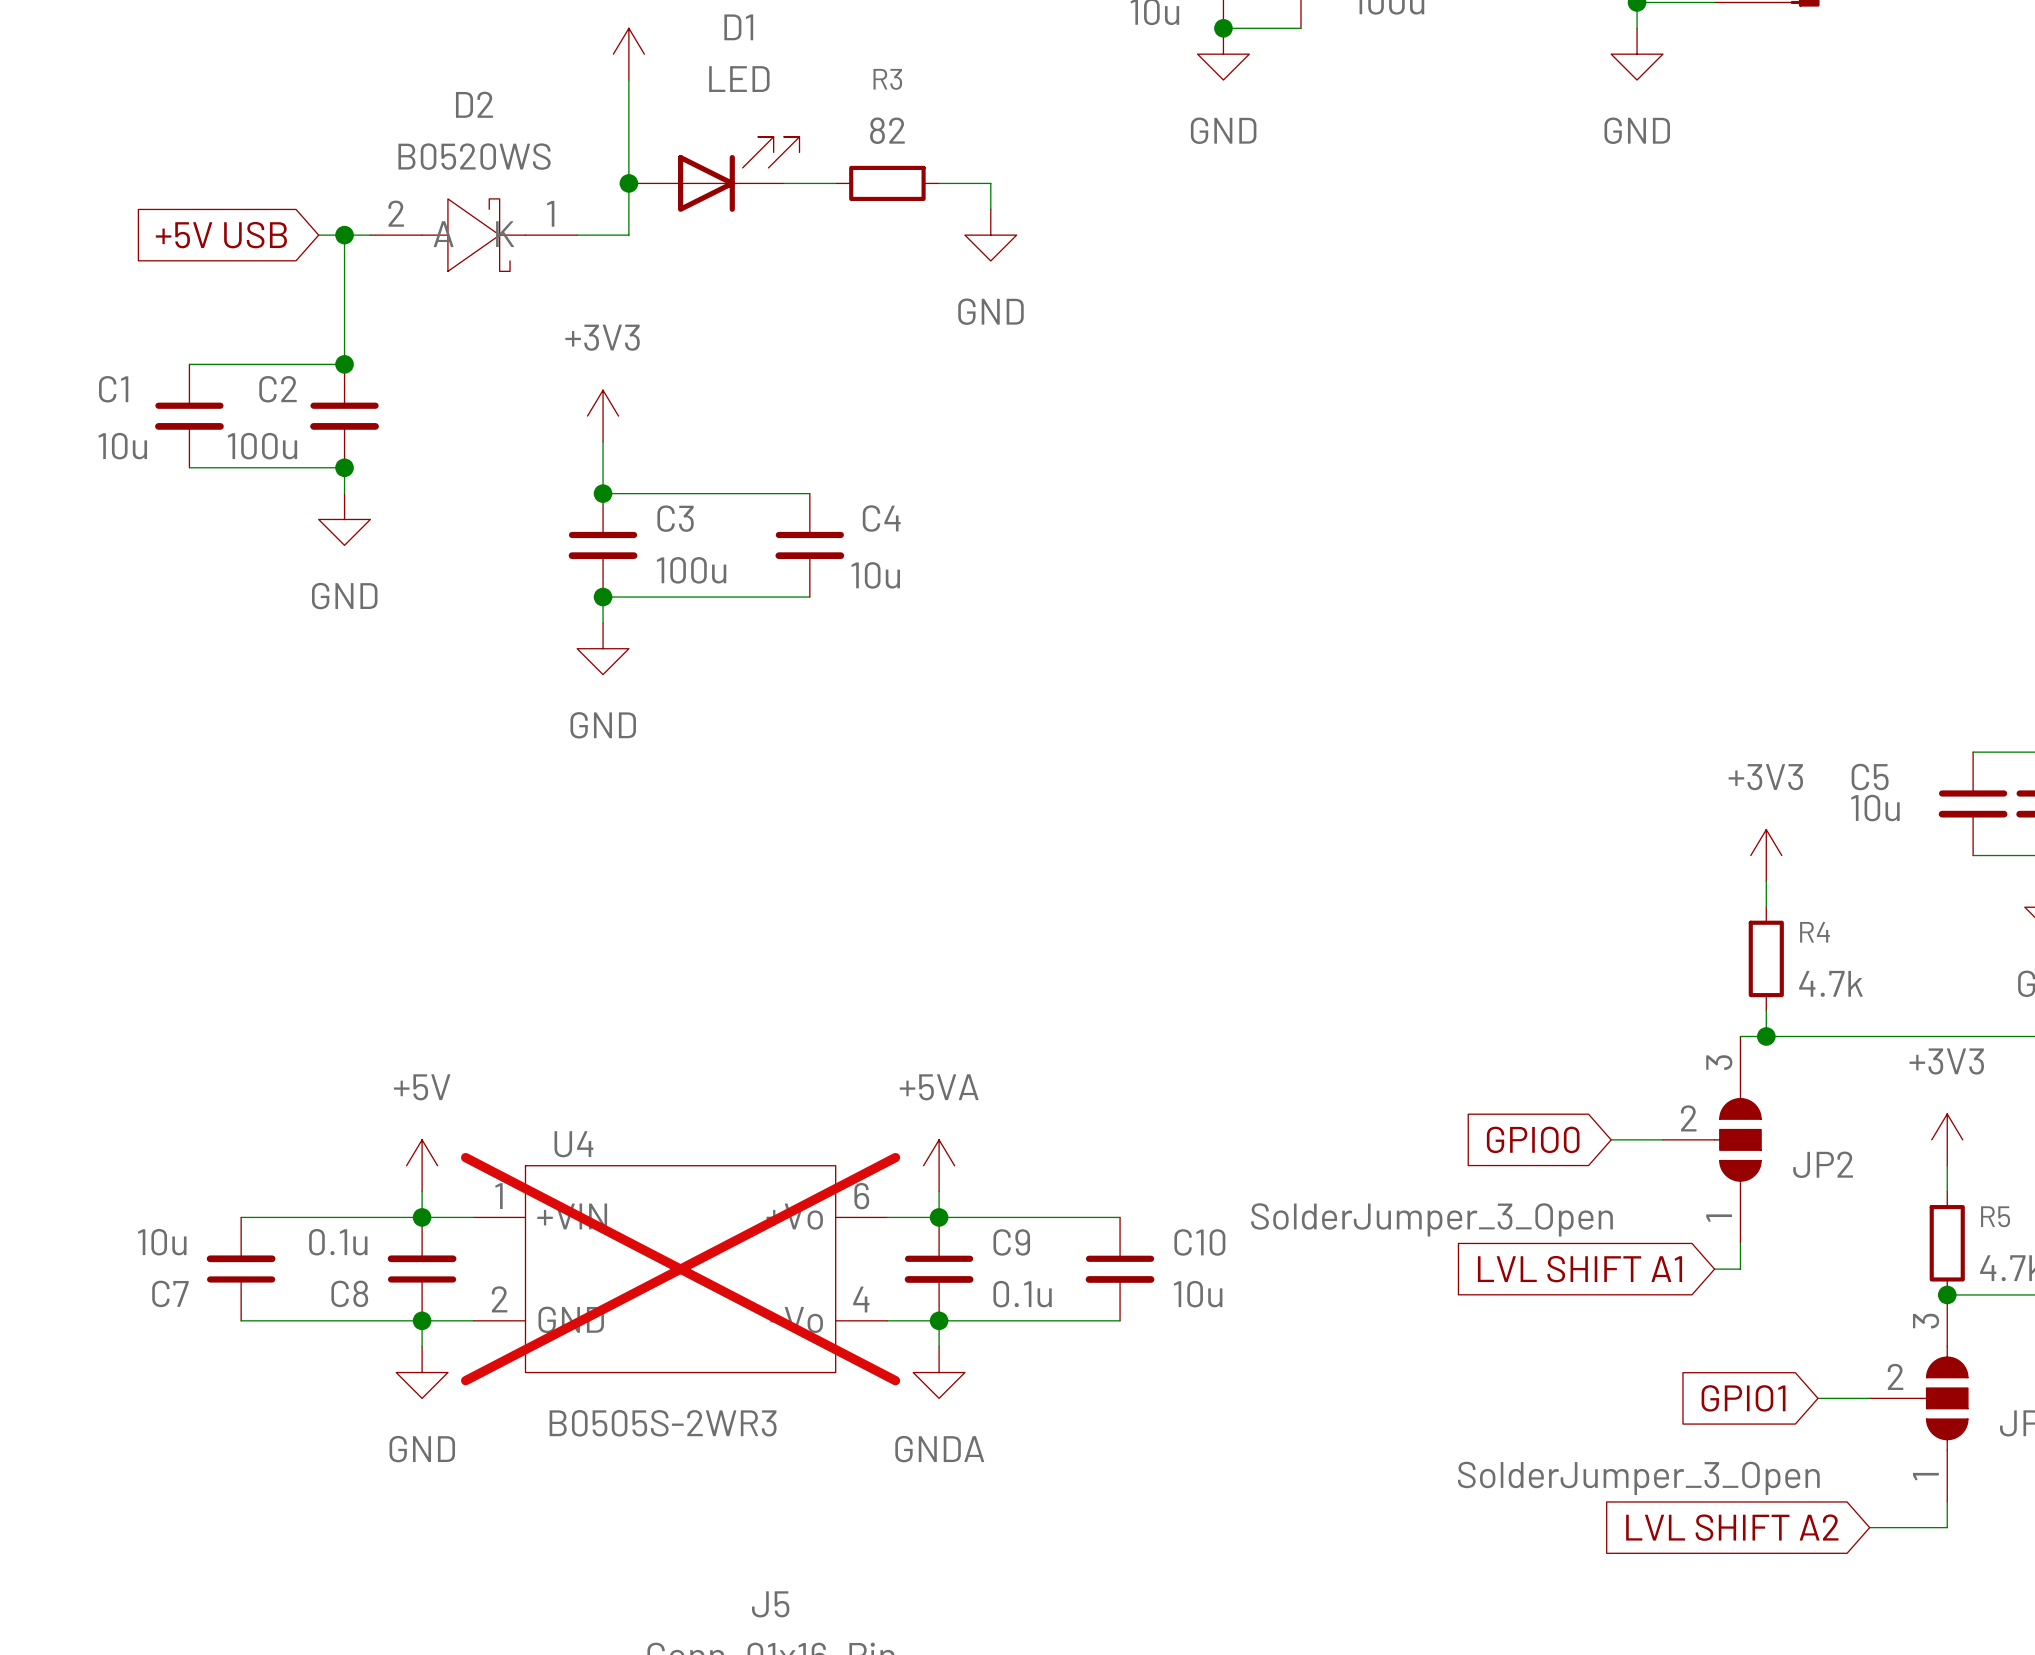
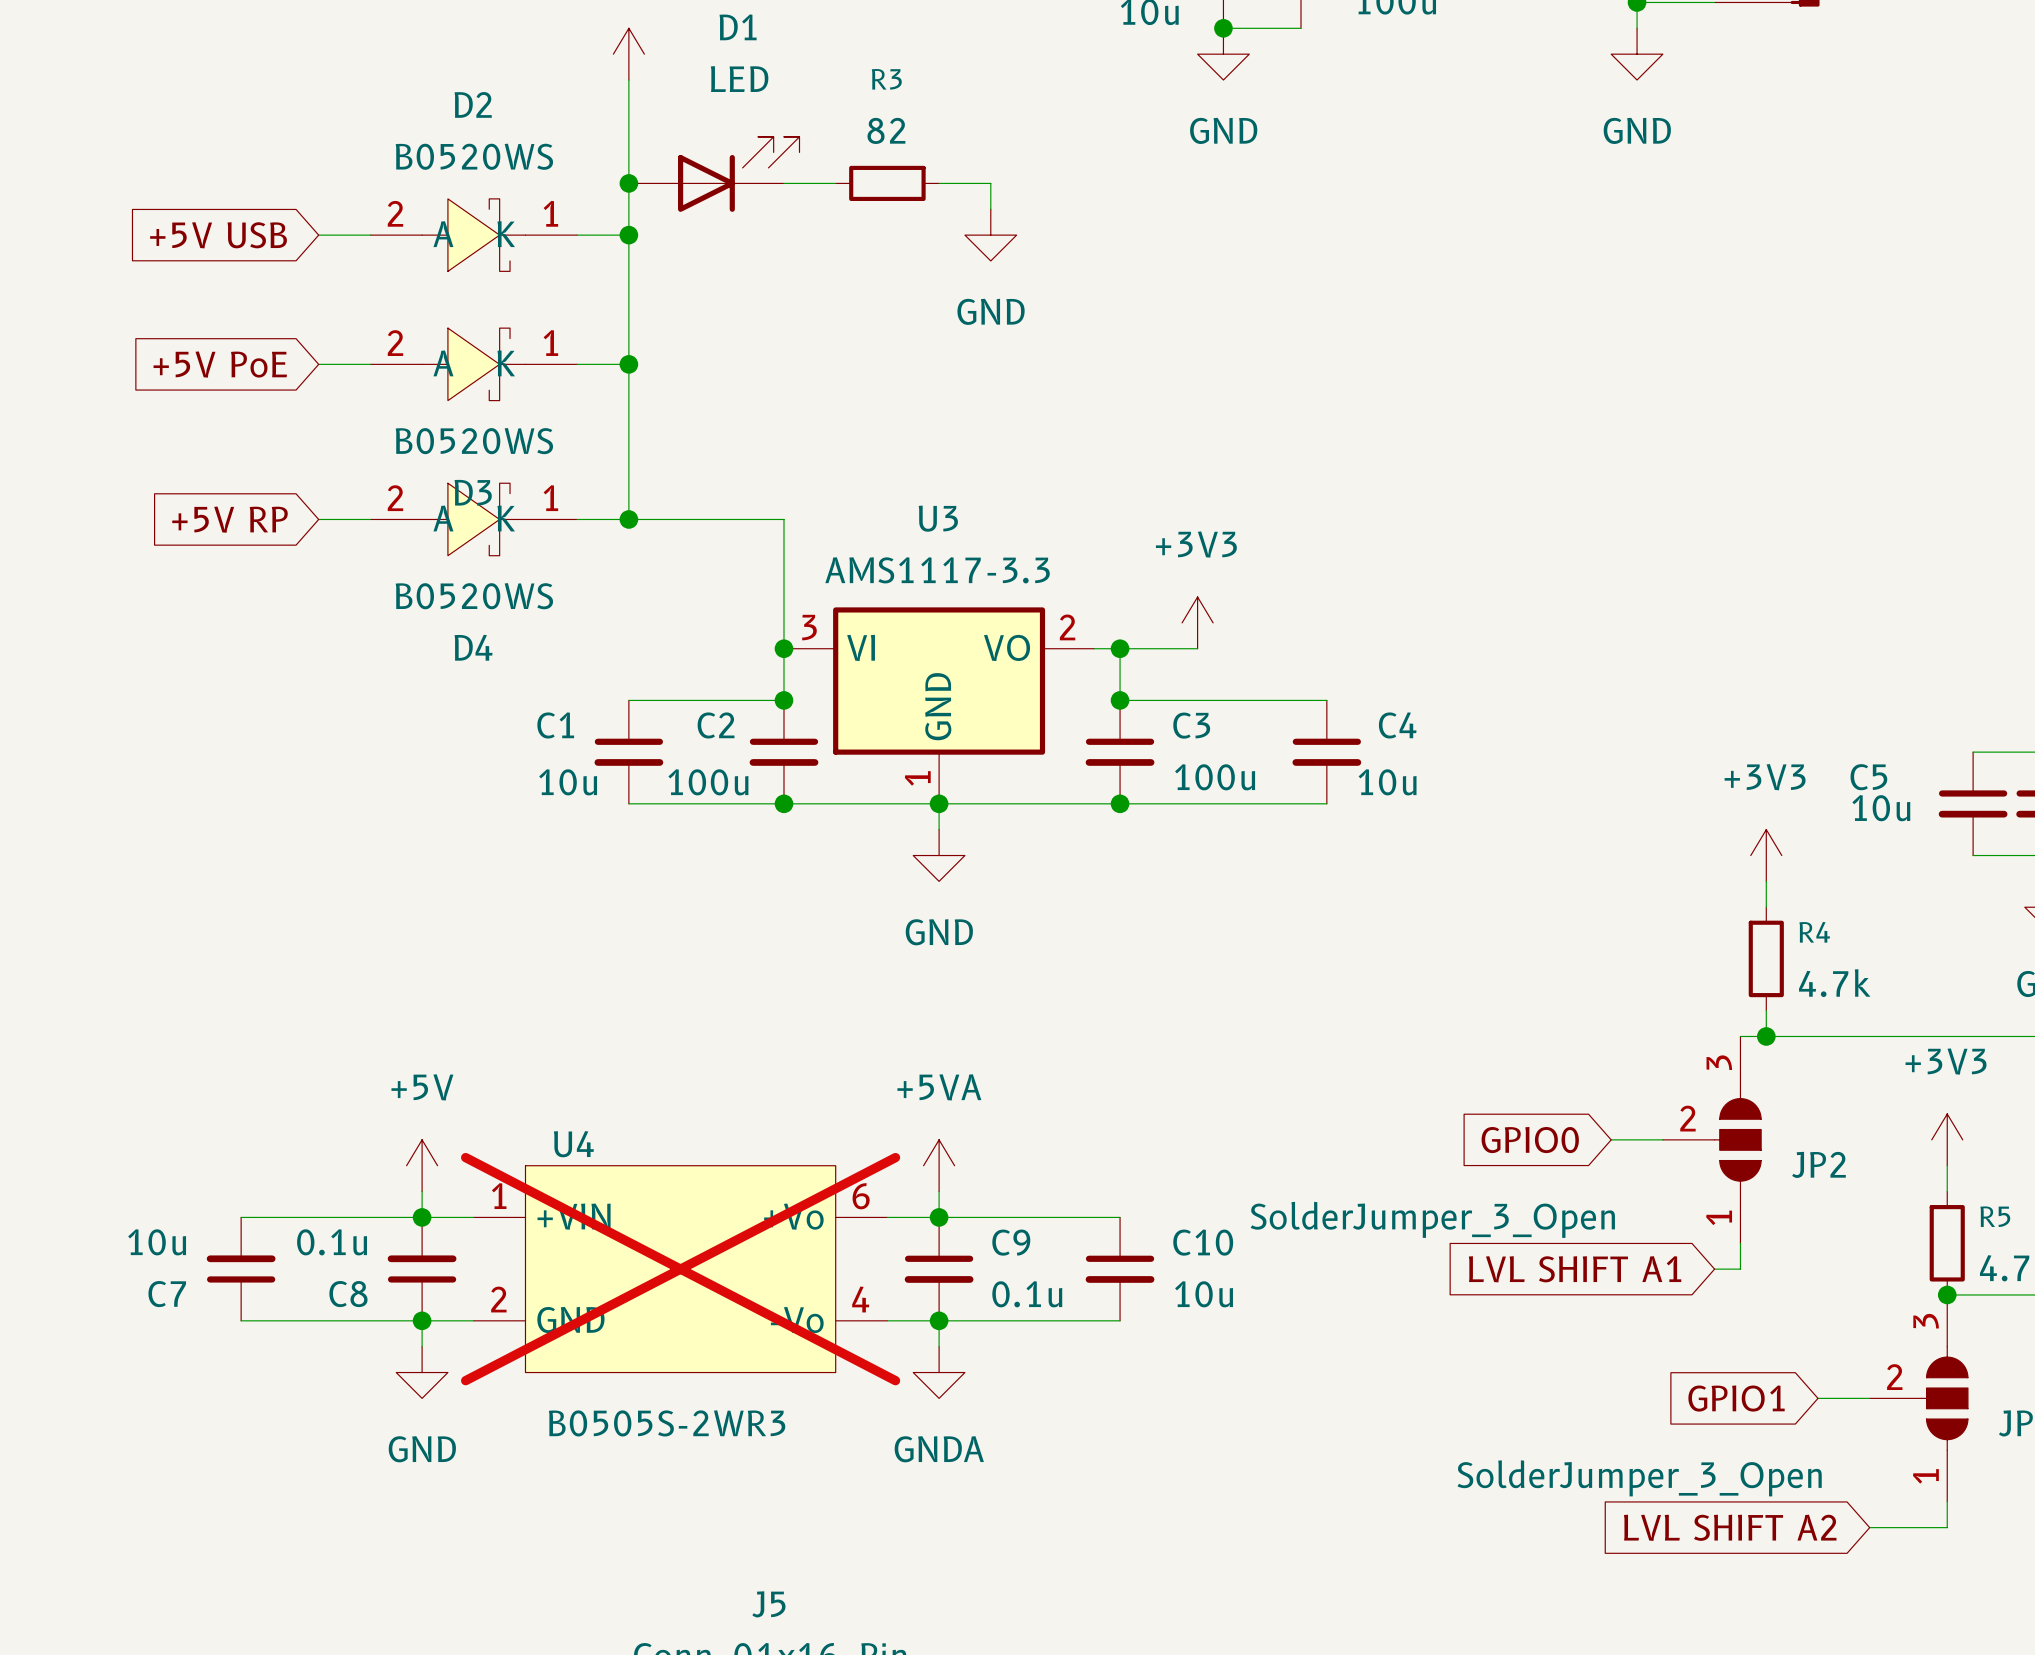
wire: (344, 235) (344, 364) -> (370, 364) (344, 364)
junction: (344, 235) -> none
wire: none -> (628, 235) (628, 519)
junction: none -> (628, 235)
wire: (189, 364) (318, 364) -> none
global label: none -> +5V PoE (220, 364)
junction: (344, 364) -> none
D3: none -> B0520WS (473, 364)
wire: none -> (577, 364) (628, 364)
junction: none -> (628, 364)
C1 position: (189, 416) -> (628, 752)
C2 position: (344, 416) -> (783, 752)
power symbol: +3V3 (603, 416) -> none
wire: (603, 441) (603, 493) (809, 493) -> none
wire: (189, 467) (344, 467) (344, 493) -> none
junction: (344, 467) -> none
junction position: (603, 493) -> (628, 519)
global label: none -> +5V RP (230, 519)
power symbol: GND (344, 519) -> none
D4: none -> B0520WS (473, 519)
wire: none -> (577, 519) (783, 519) (783, 700) (628, 700)
C3 position: (603, 545) -> (1120, 752)
C4 position: (809, 545) -> (1326, 752)
junction: (603, 597) -> none
wire: (809, 597) (603, 597) (603, 622) -> none
power symbol: none -> +3V3 (1197, 622)
power symbol: GND (603, 648) -> none
junction: none -> (783, 648)
wire: none -> (1094, 648) (1197, 648)
wire: none -> (1120, 648) (1120, 700) (1326, 700)
junction: none -> (1120, 648)
junction: none -> (783, 700)
junction: none -> (1120, 700)
U3: none -> AMS1117-3.3 (939, 705)
wire: none -> (628, 803) (1326, 803)
junction: none -> (783, 803)
wire: none -> (939, 803) (939, 829)
junction: none -> (939, 803)
junction: none -> (1120, 803)
power symbol: none -> GND (939, 855)

